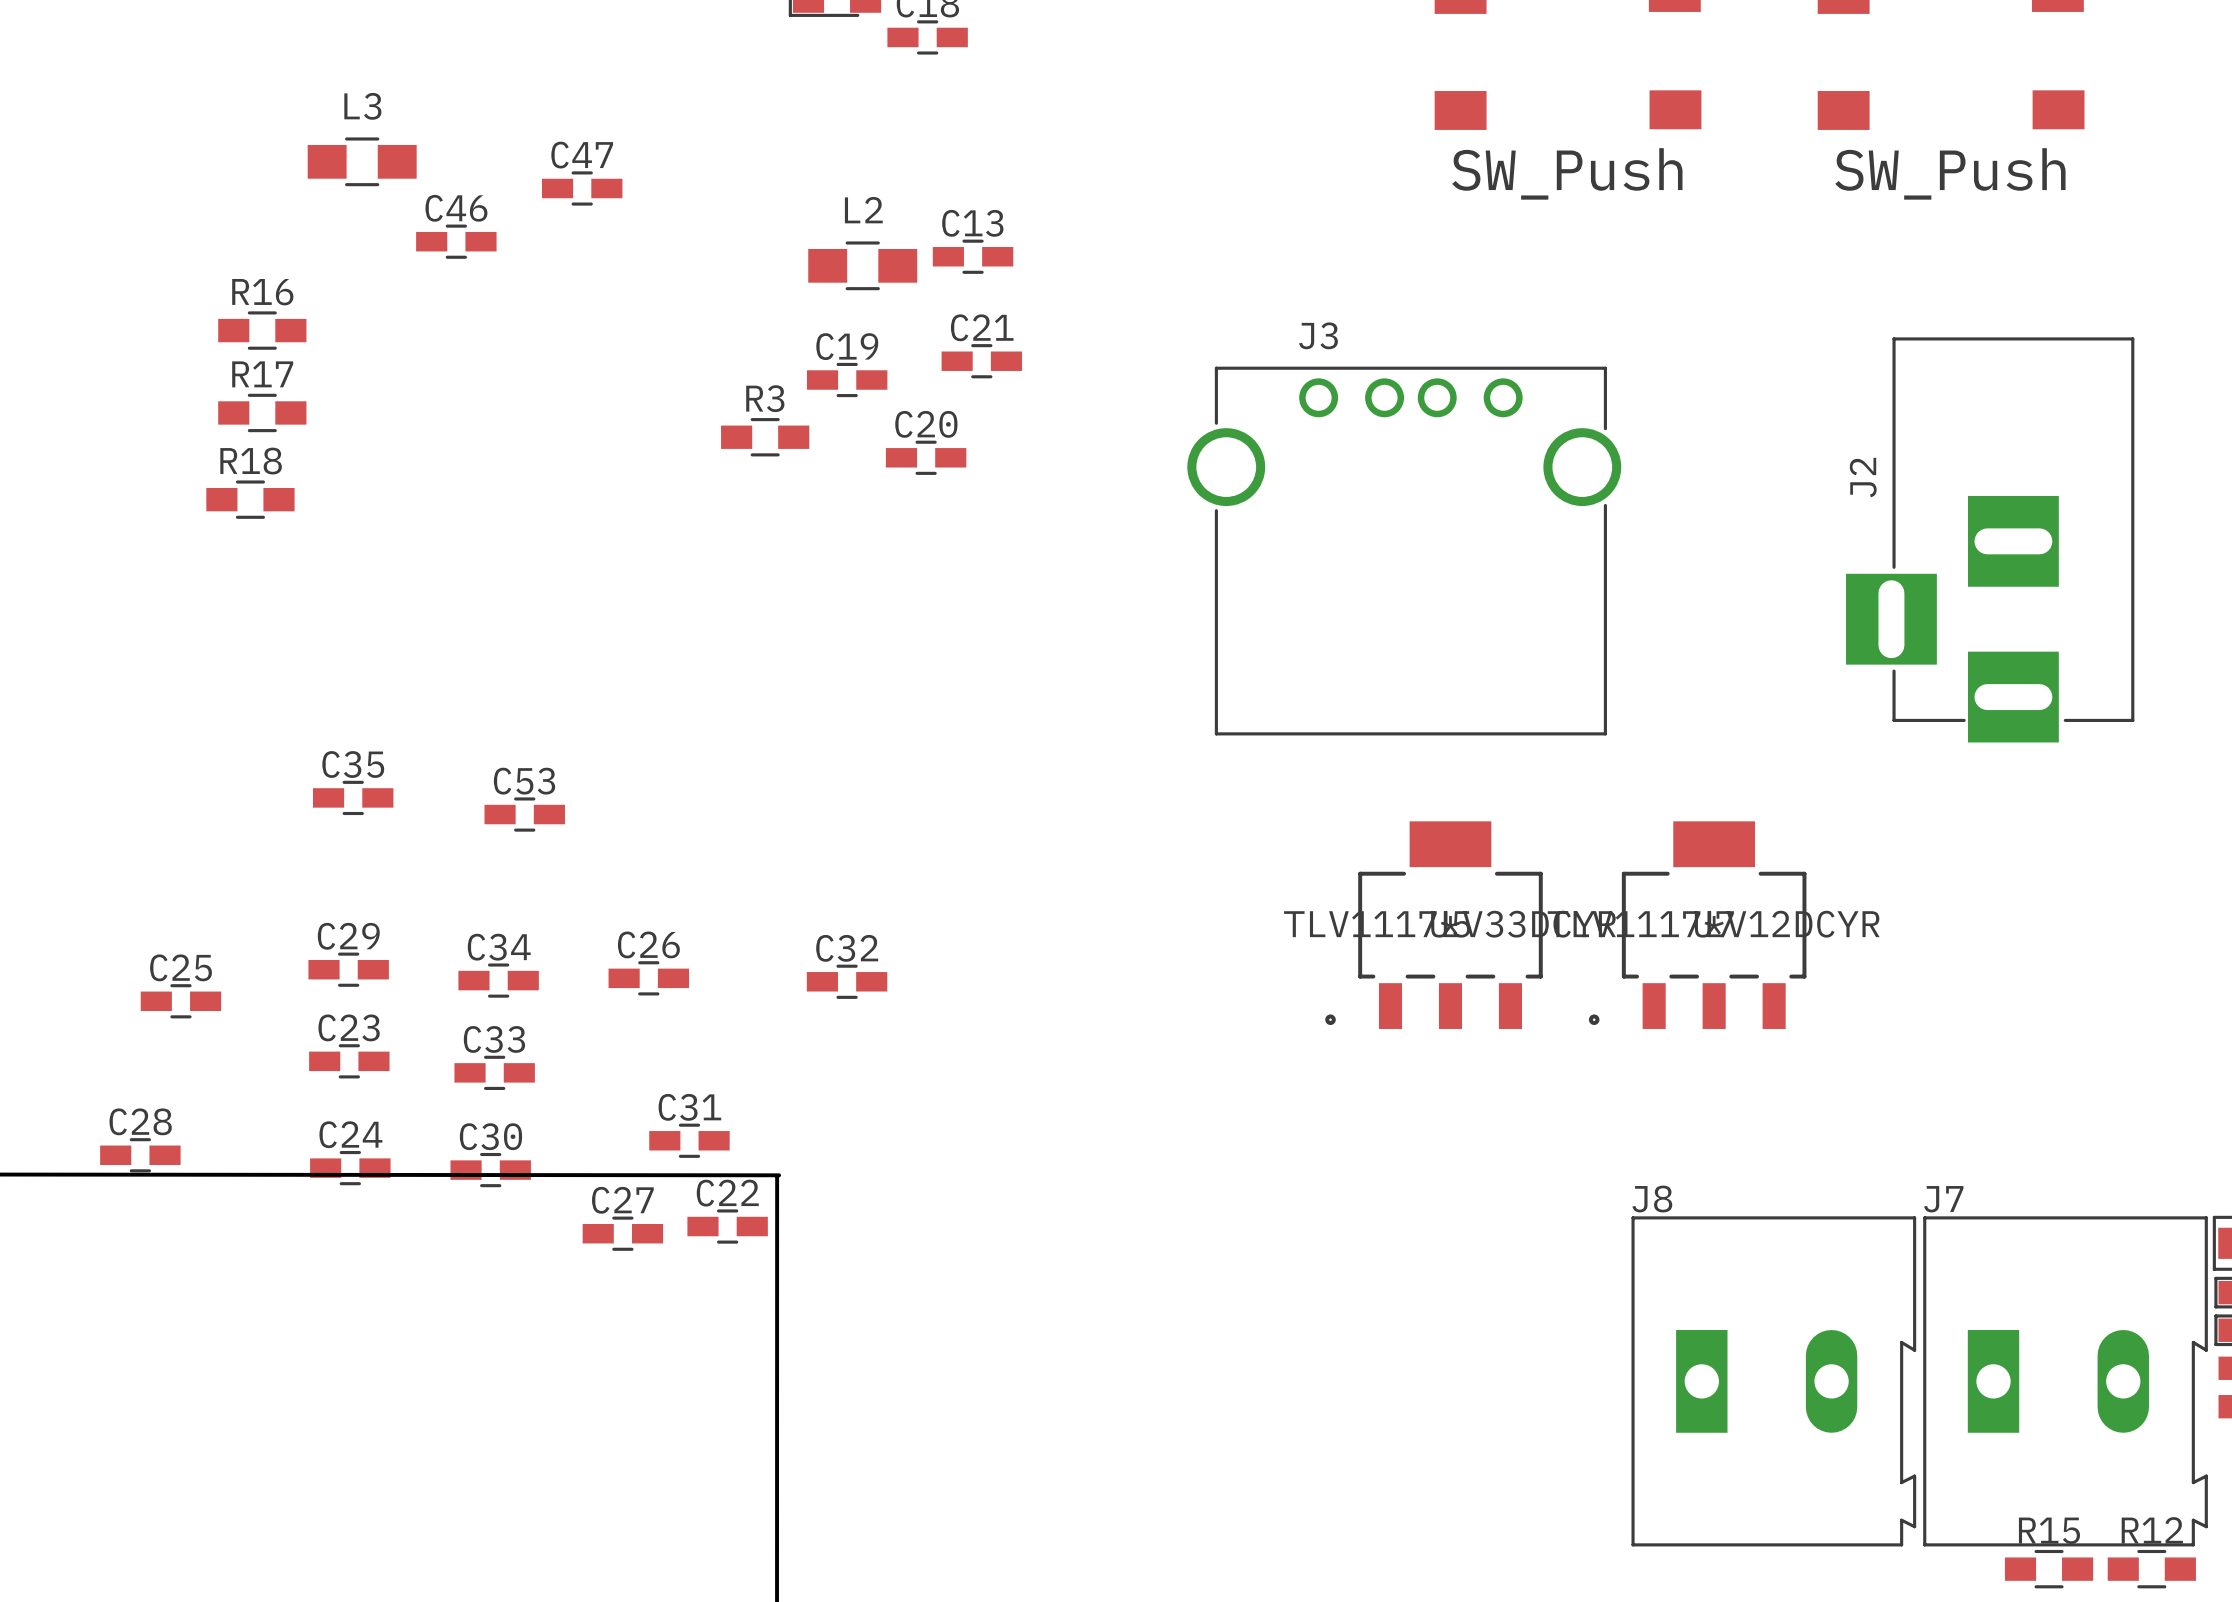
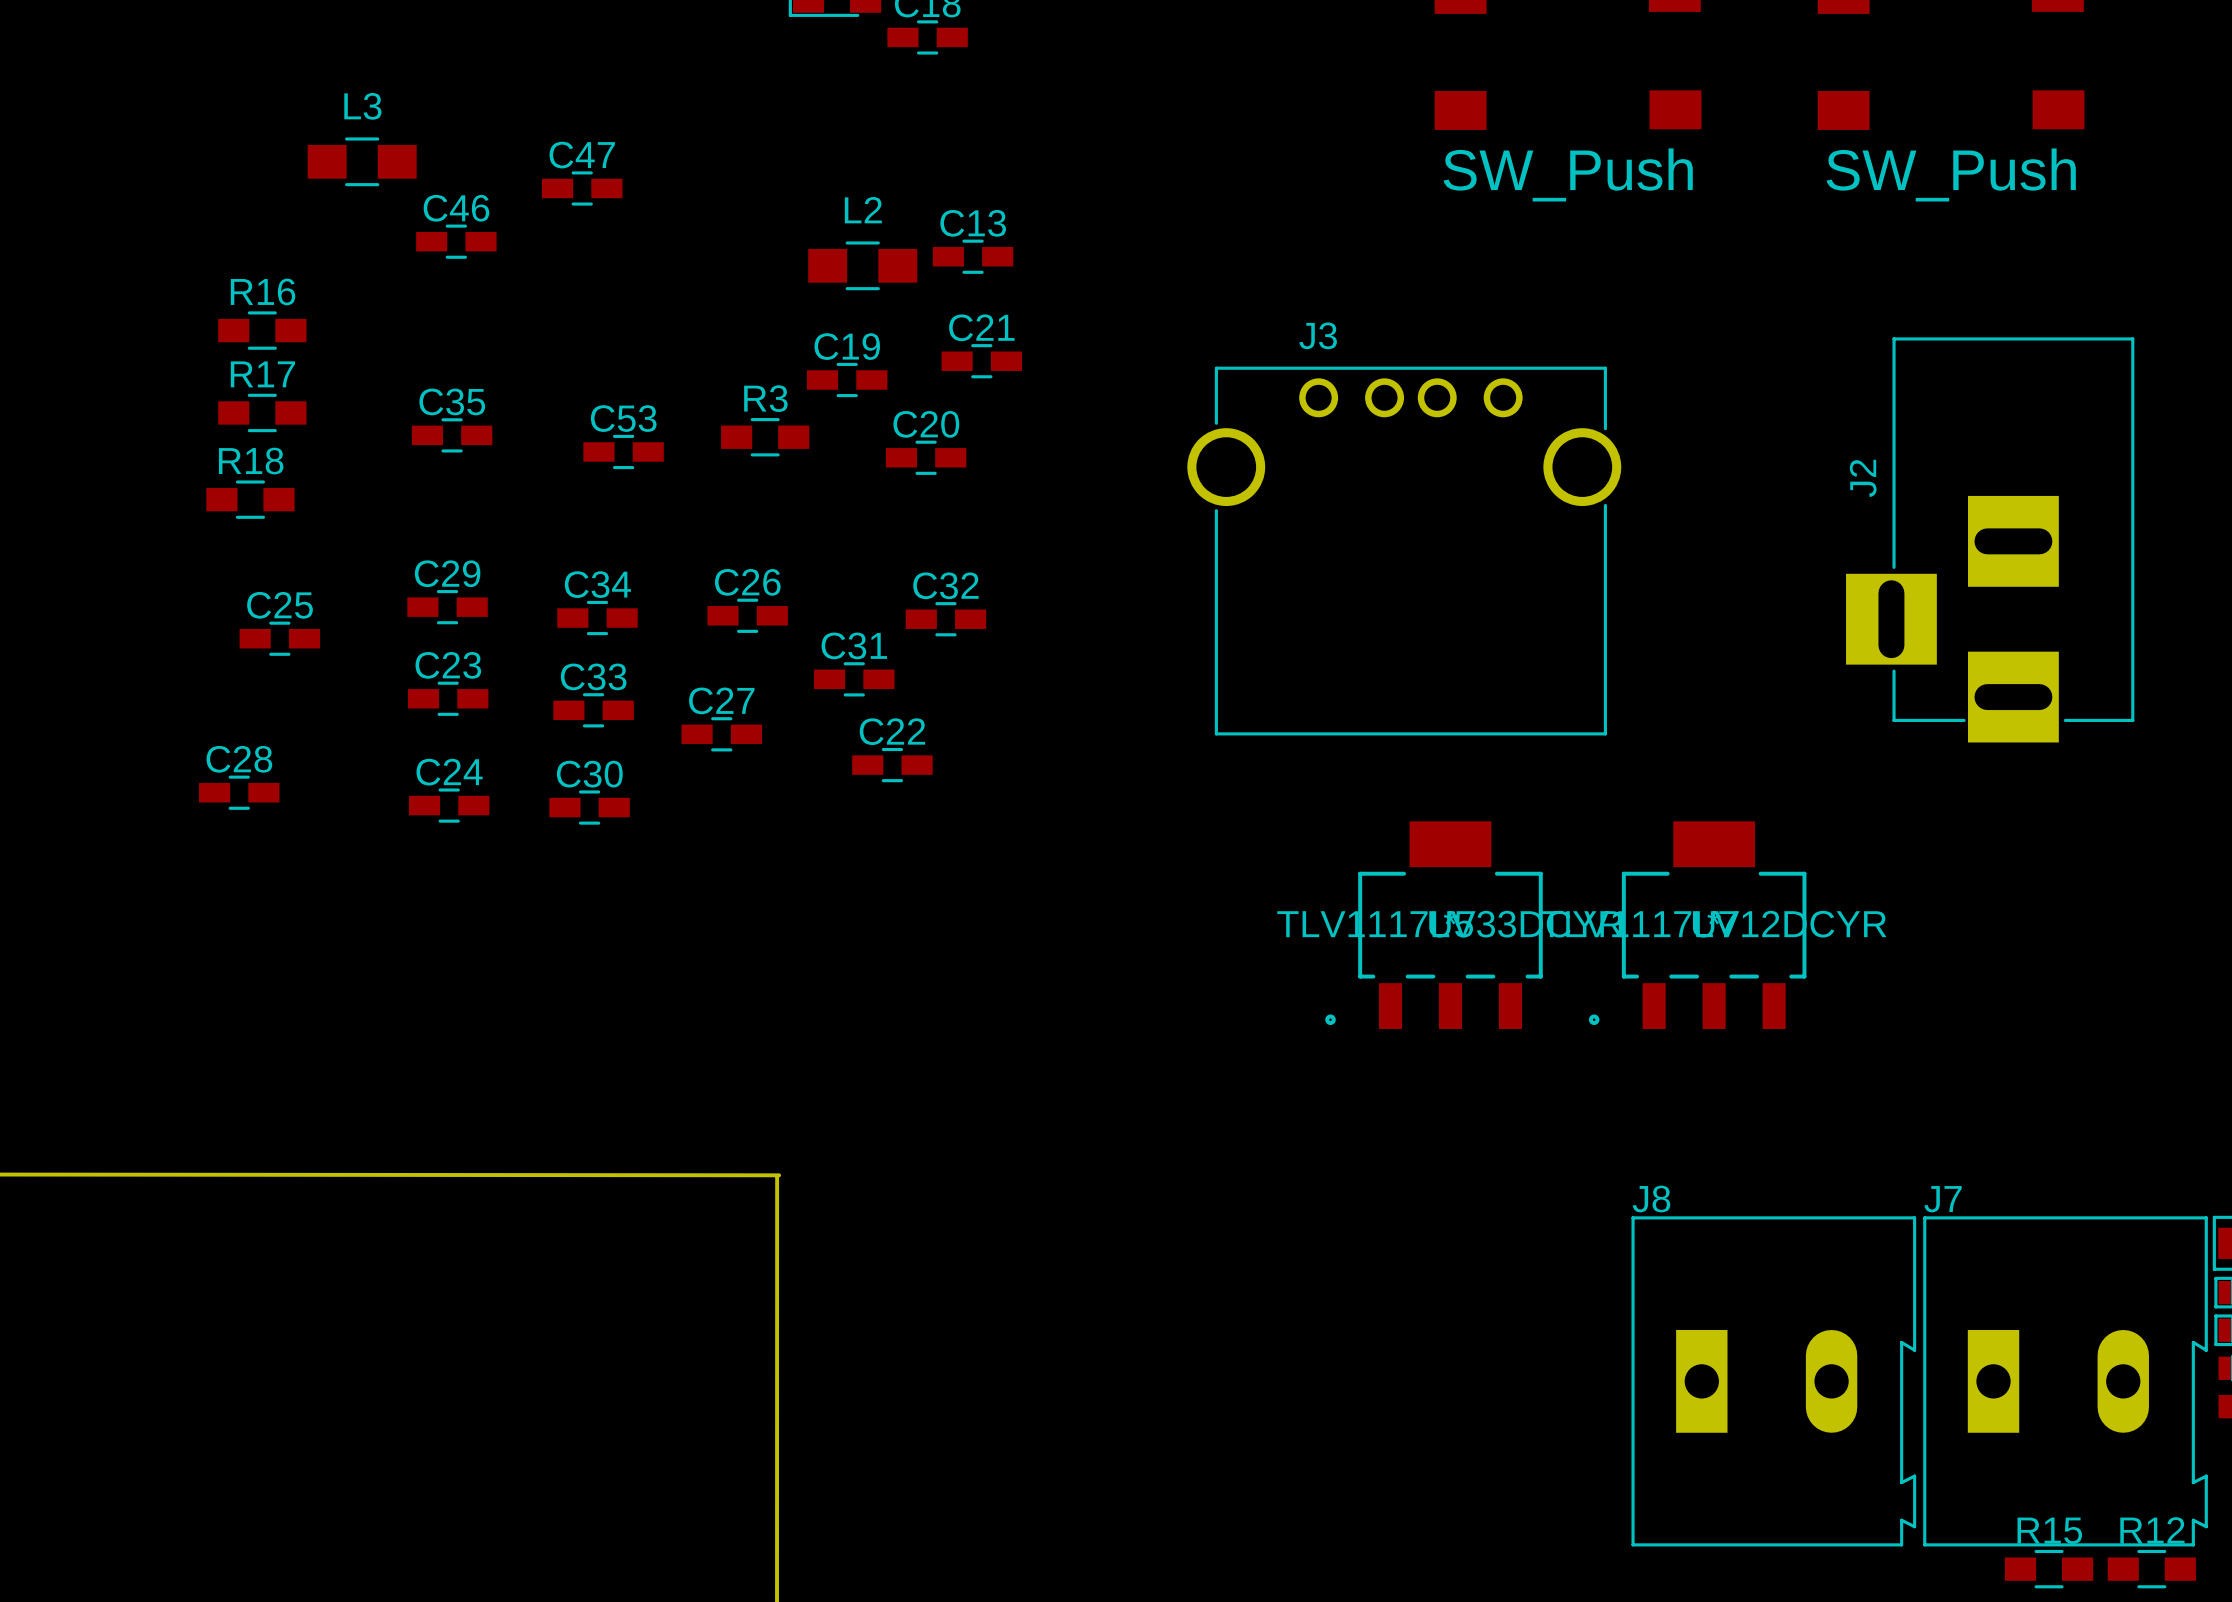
C35 position: (353, 797) -> (452, 435)
C53 position: (524, 814) -> (623, 451)
C29 position: (348, 969) -> (447, 607)
C26 position: (648, 978) -> (747, 615)
C34 position: (498, 980) -> (597, 618)
C32 position: (847, 981) -> (945, 619)
C25 position: (180, 1001) -> (279, 638)
C23 position: (349, 1061) -> (448, 698)
C33 position: (494, 1072) -> (593, 710)
C31 position: (689, 1140) -> (854, 679)
C28 position: (140, 1155) -> (239, 792)
C24 position: (350, 1168) -> (449, 805)
C30 position: (490, 1170) -> (589, 807)
C22 position: (727, 1226) -> (892, 765)
C27 position: (622, 1233) -> (721, 734)

